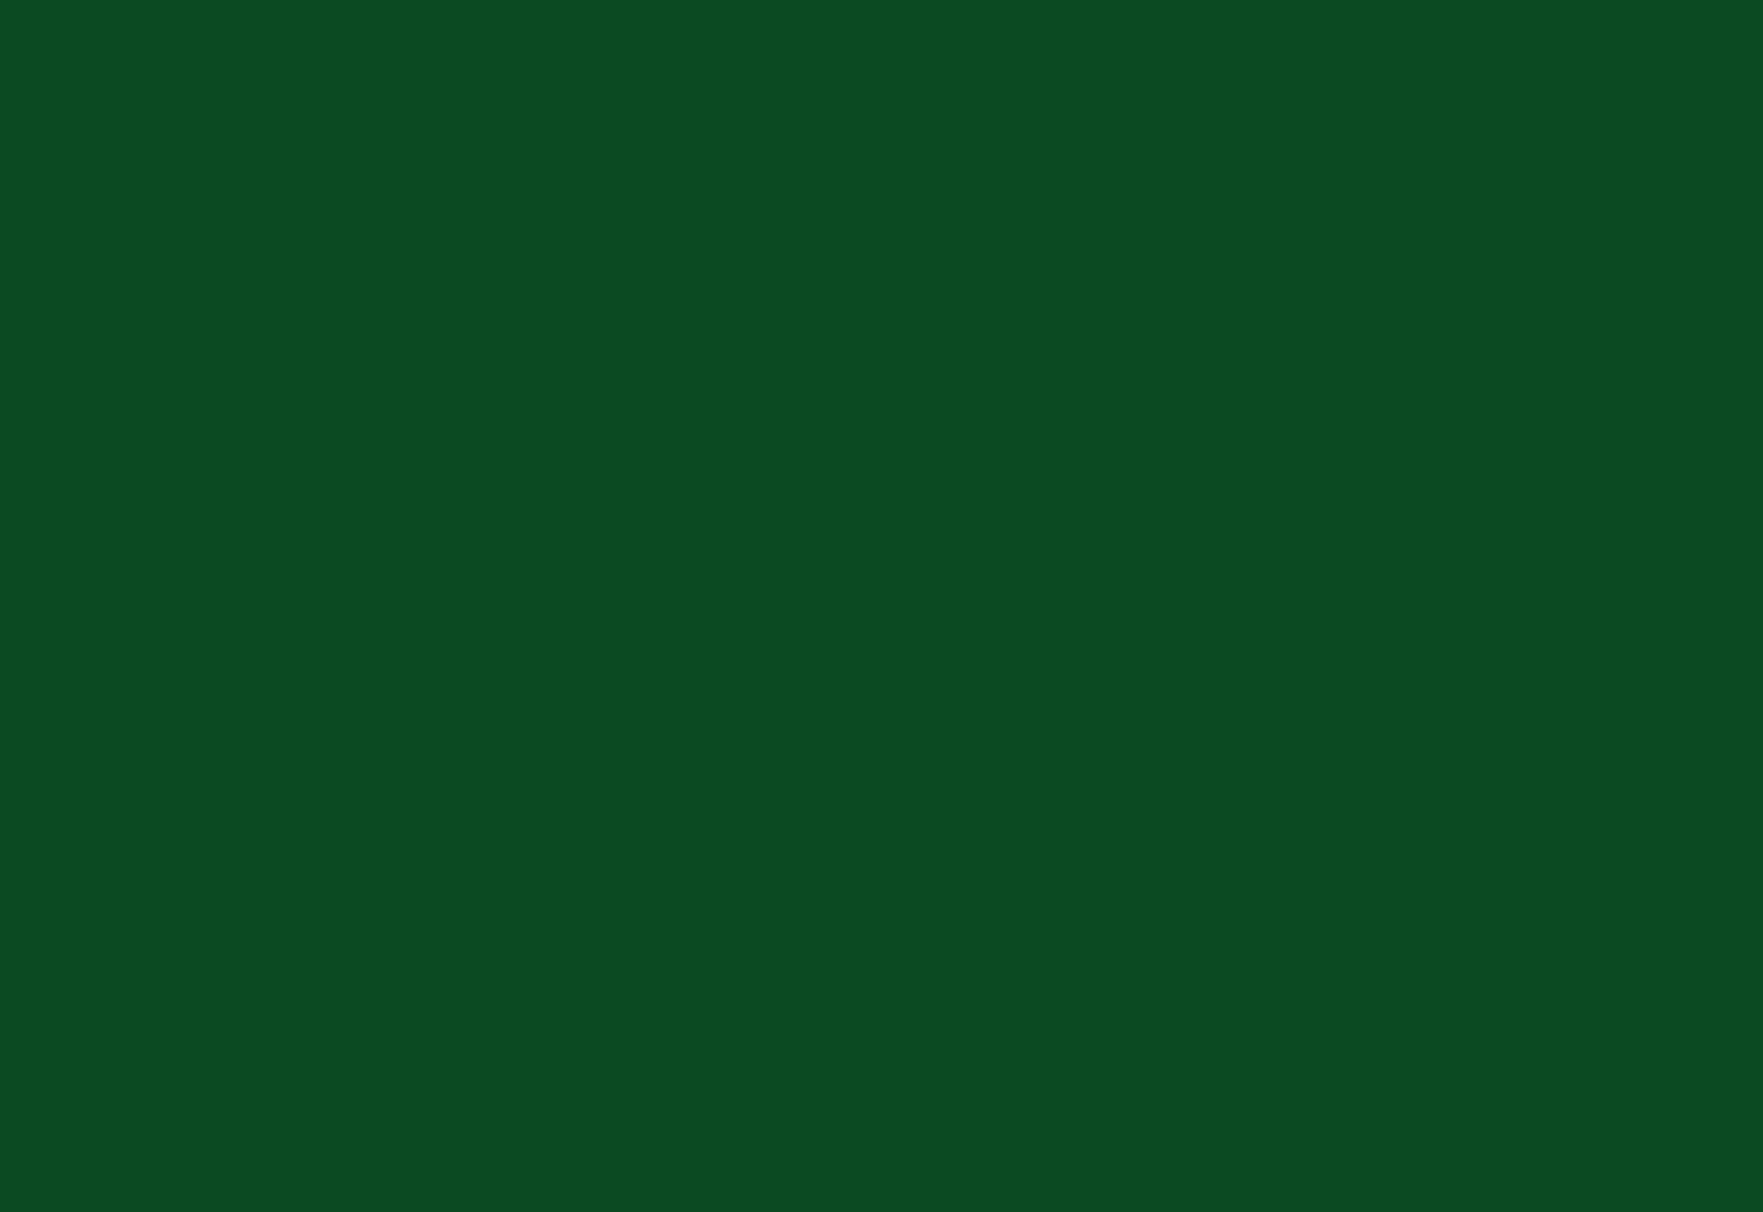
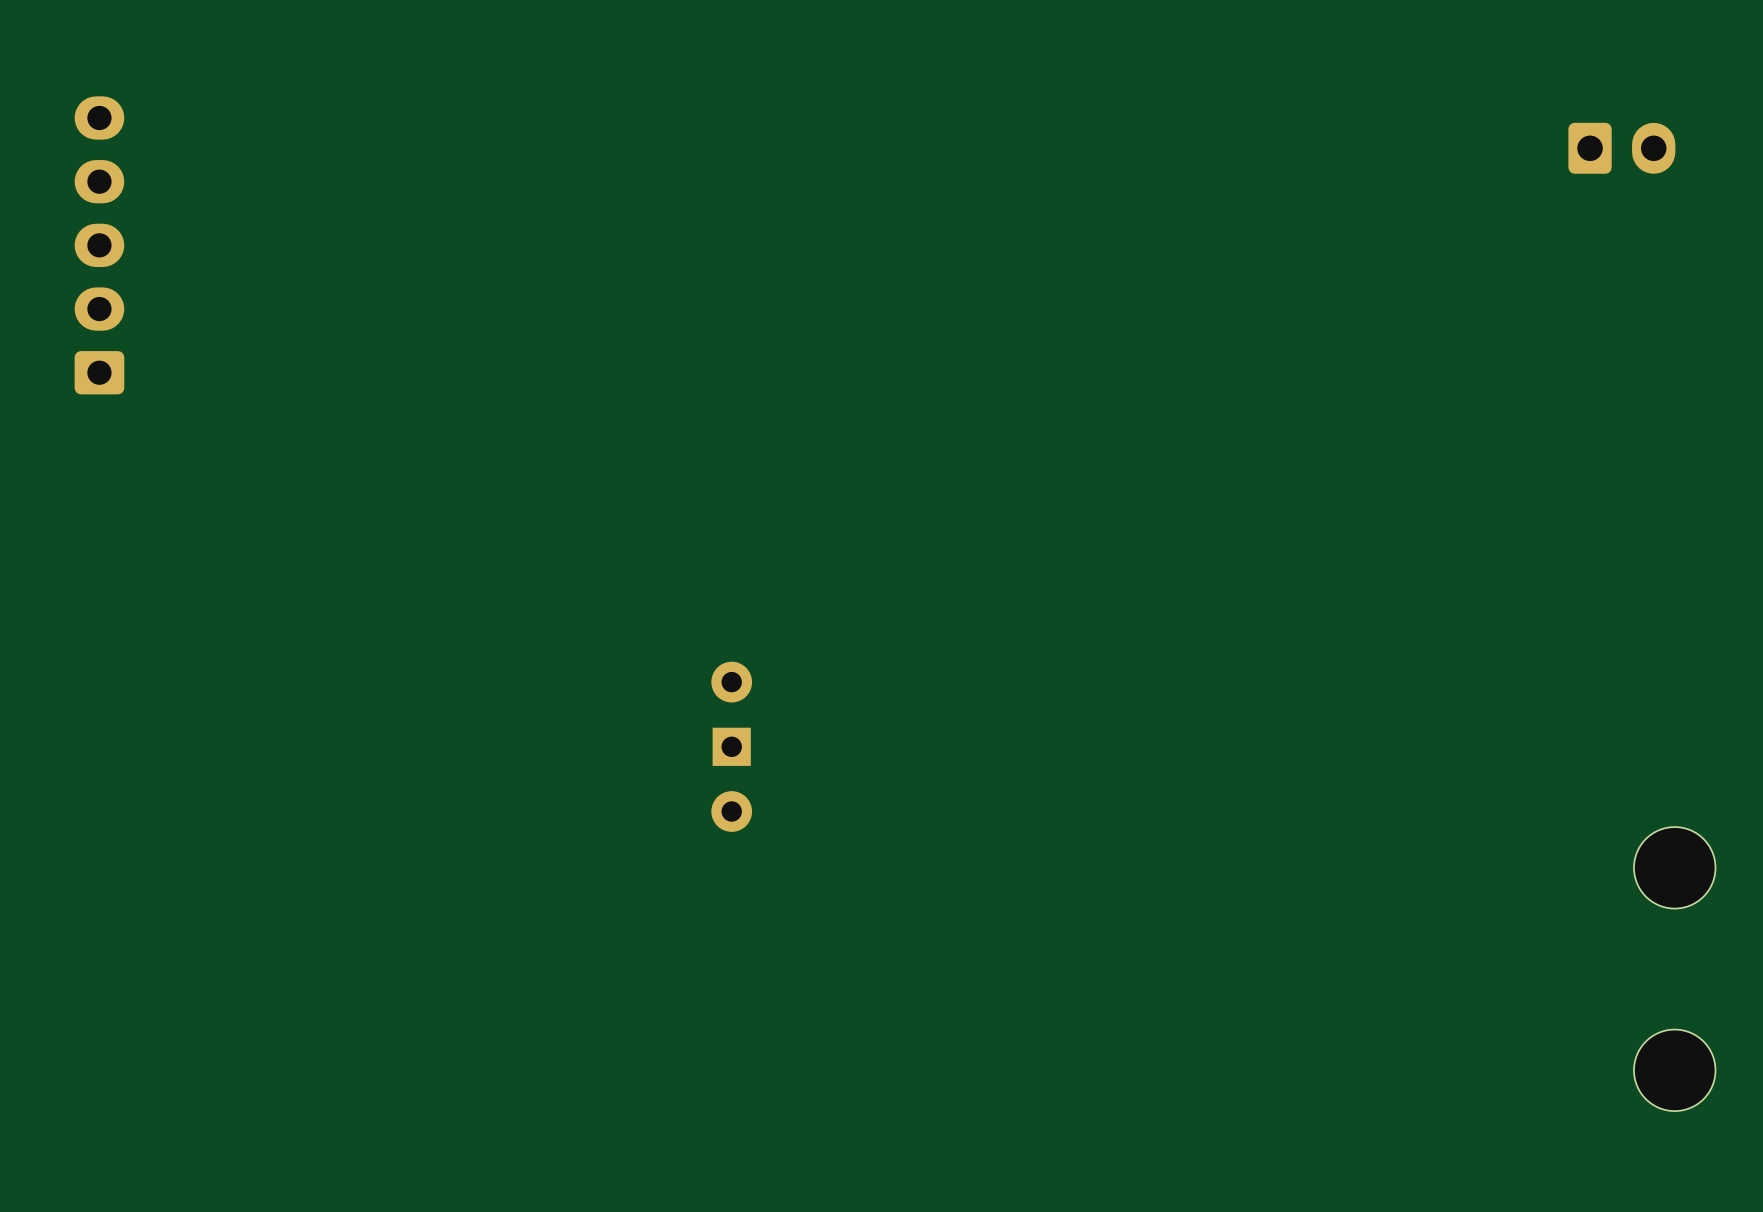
part: none -> (1621, 148)
part: none -> (99, 245)
part: none -> (731, 746)
part: none -> (1674, 867)
part: none -> (1674, 1070)

